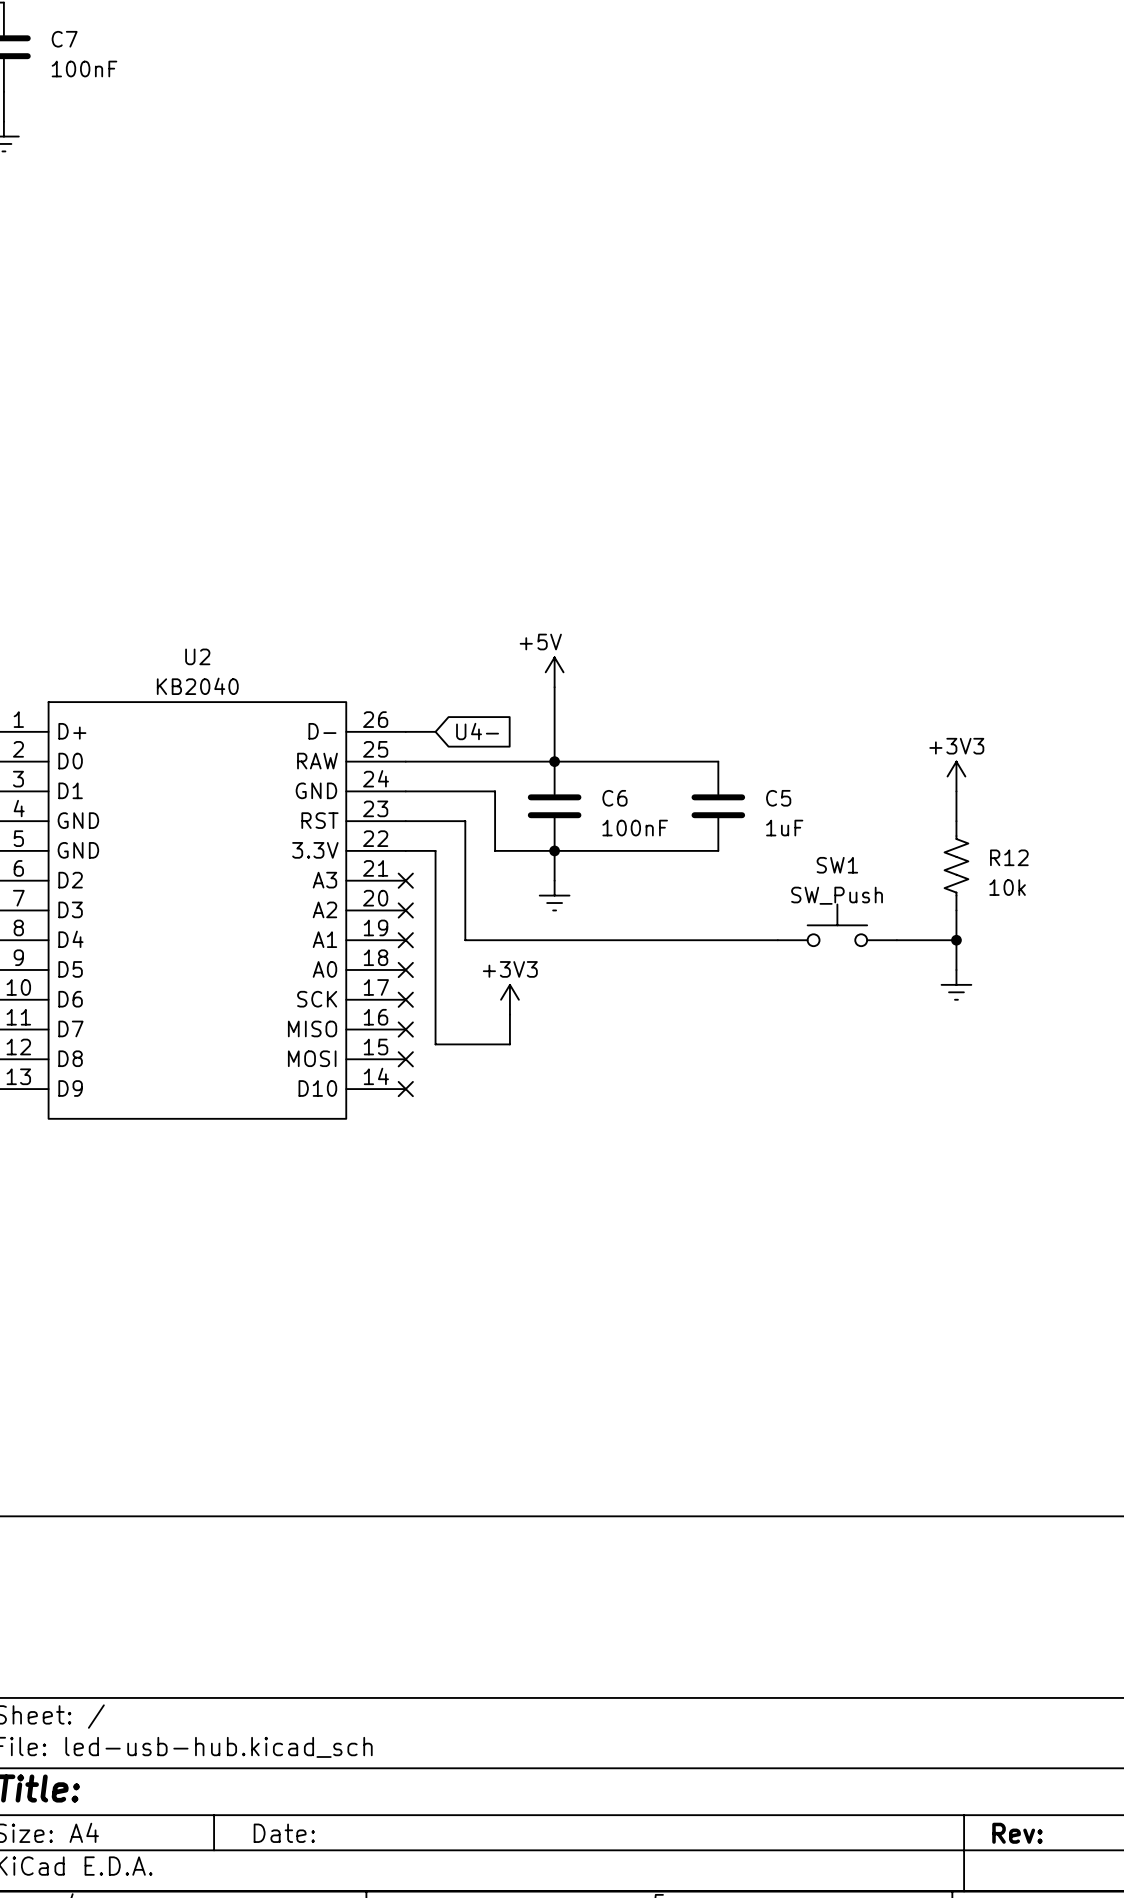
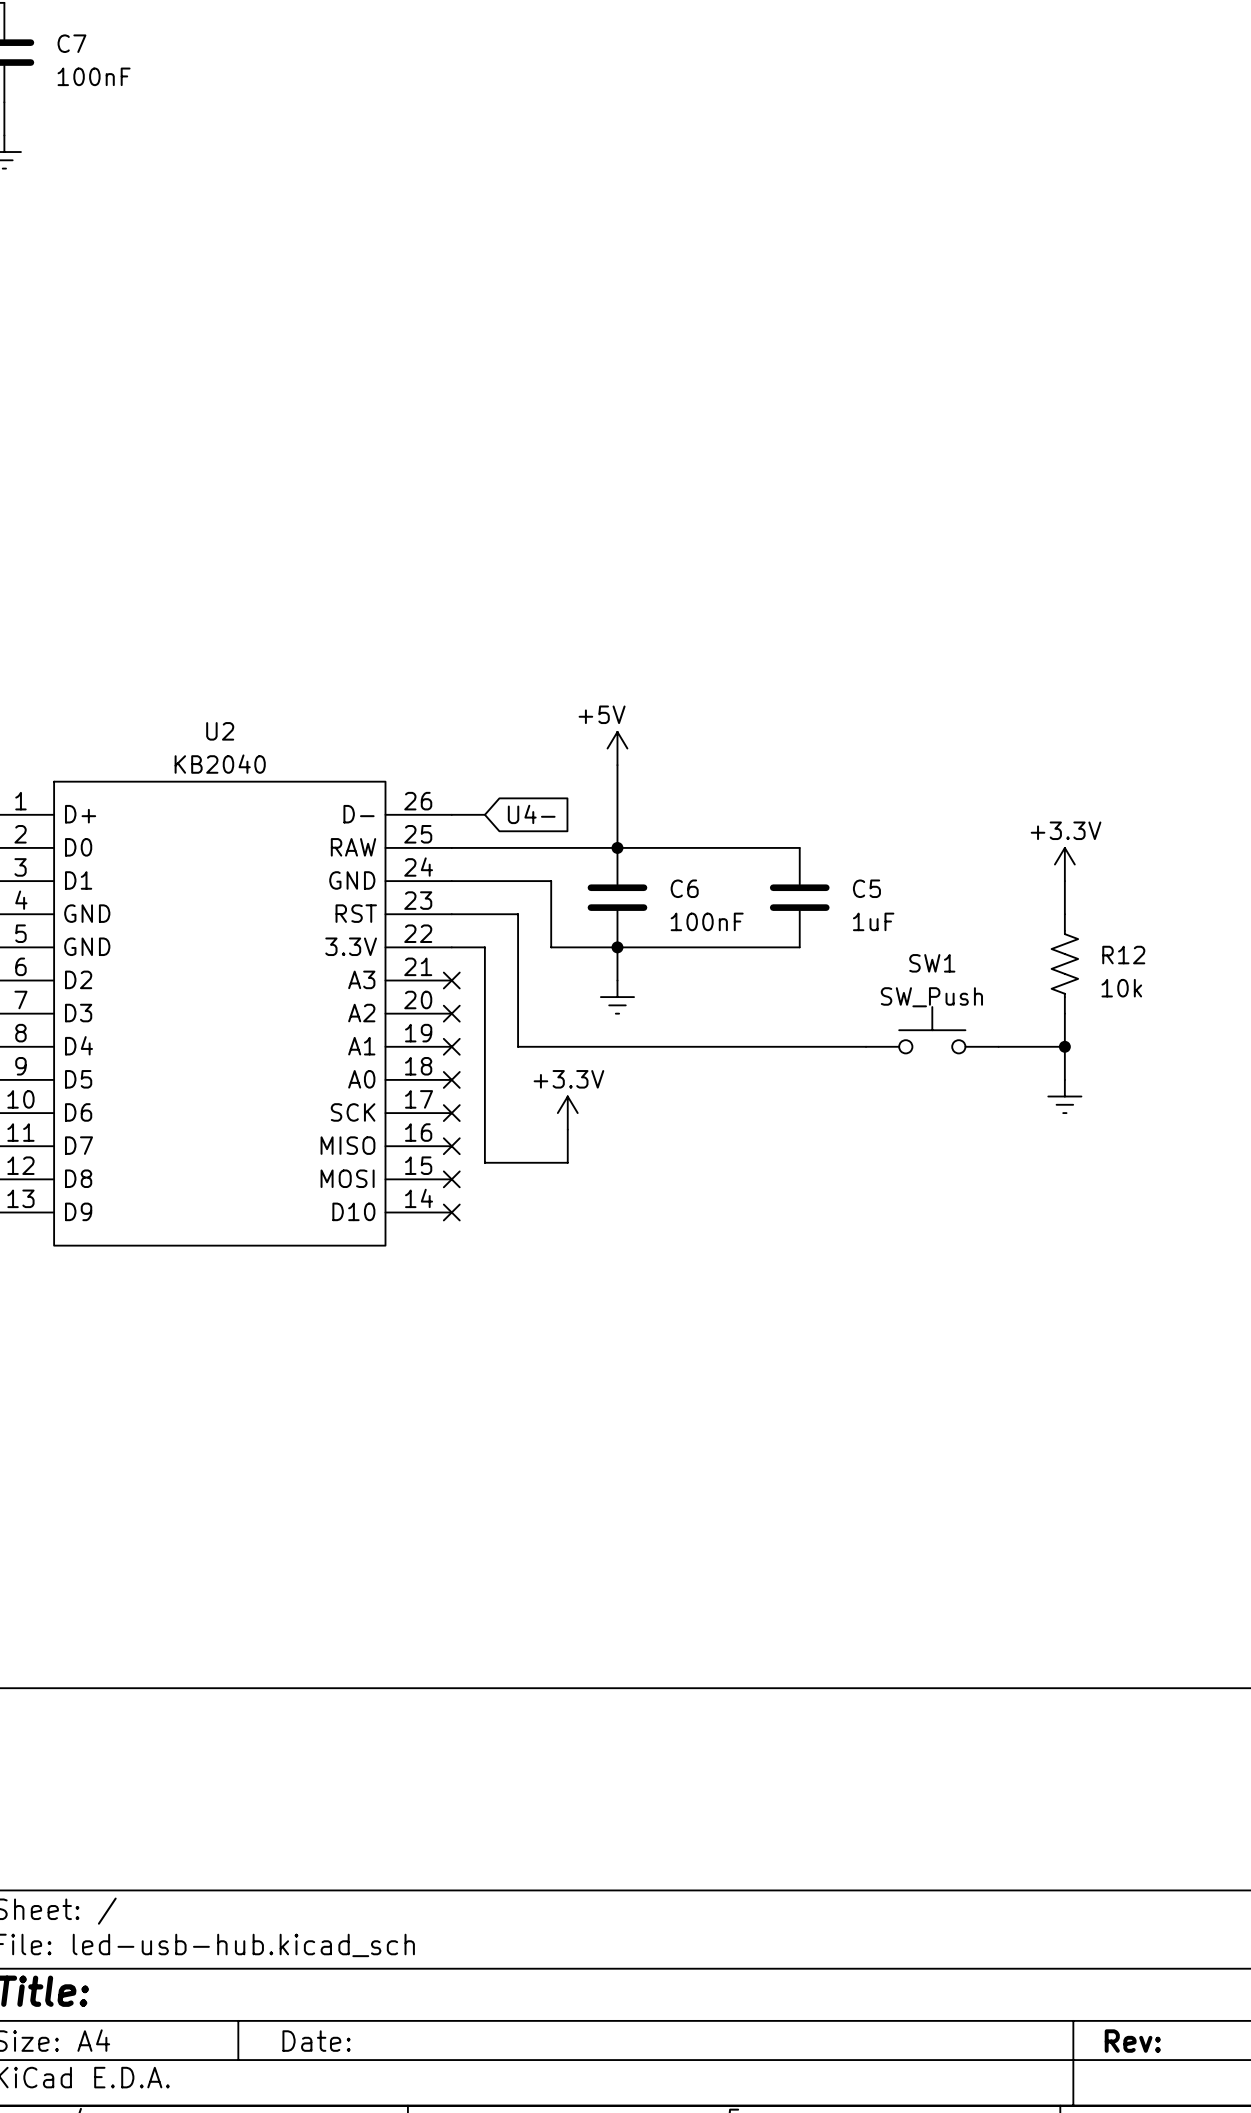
power symbol: +3V3 (956, 776) -> +3.3V (1064, 864)
power symbol: +3V3 (509, 999) -> +3.3V (567, 1113)

